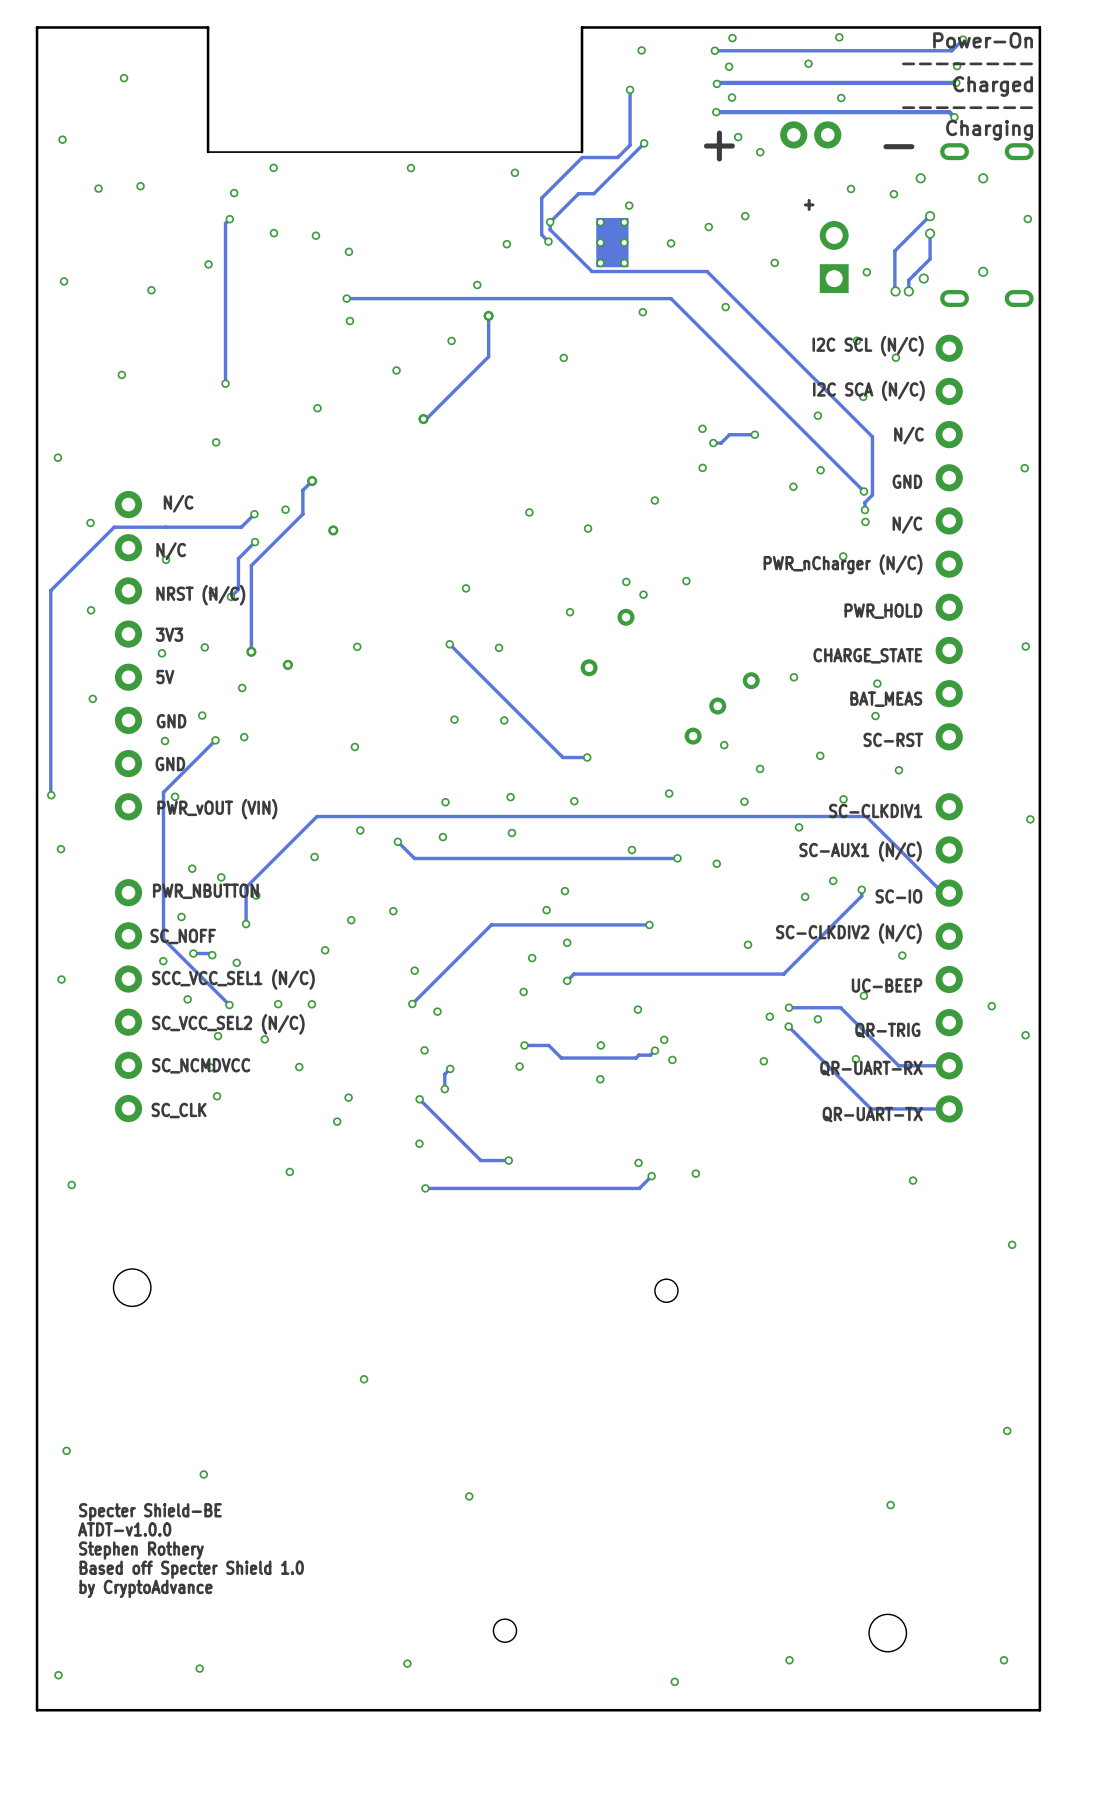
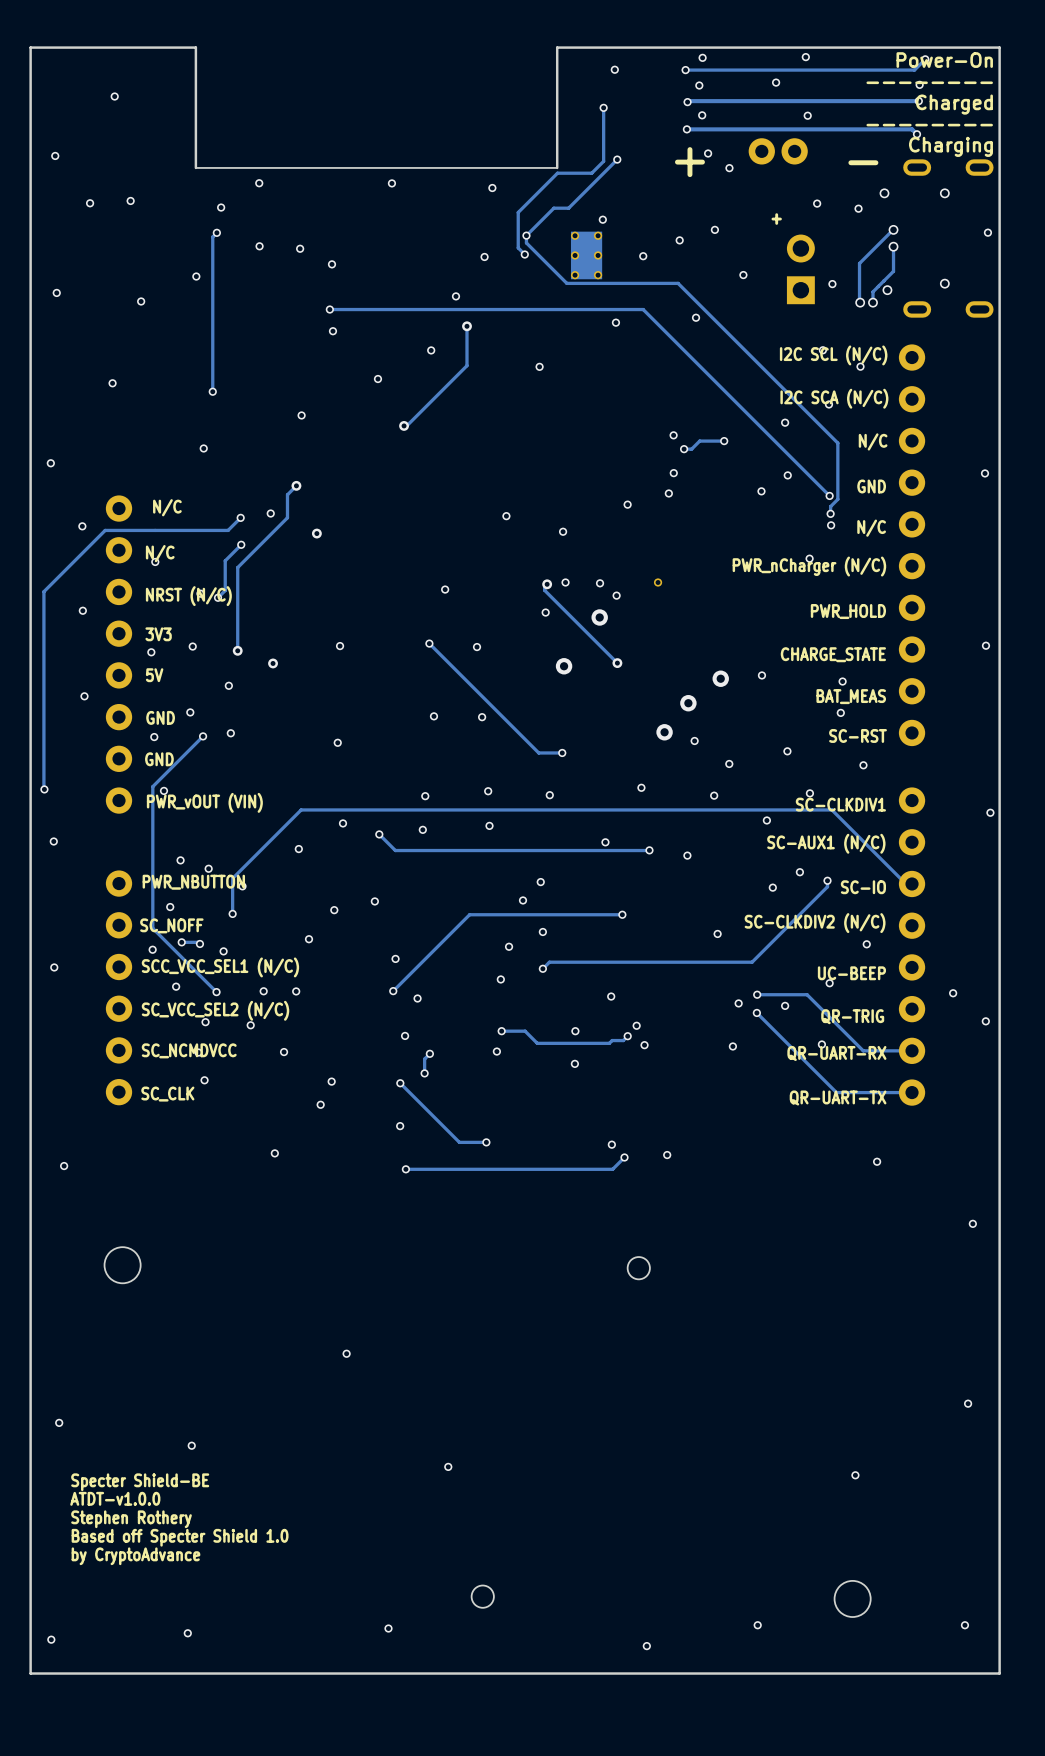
via: none -> (668, 493)
via: none -> (565, 582)
track: none -> (547, 584) (544, 590) (617, 663)
via: none -> (547, 584)
via: none -> (617, 663)

